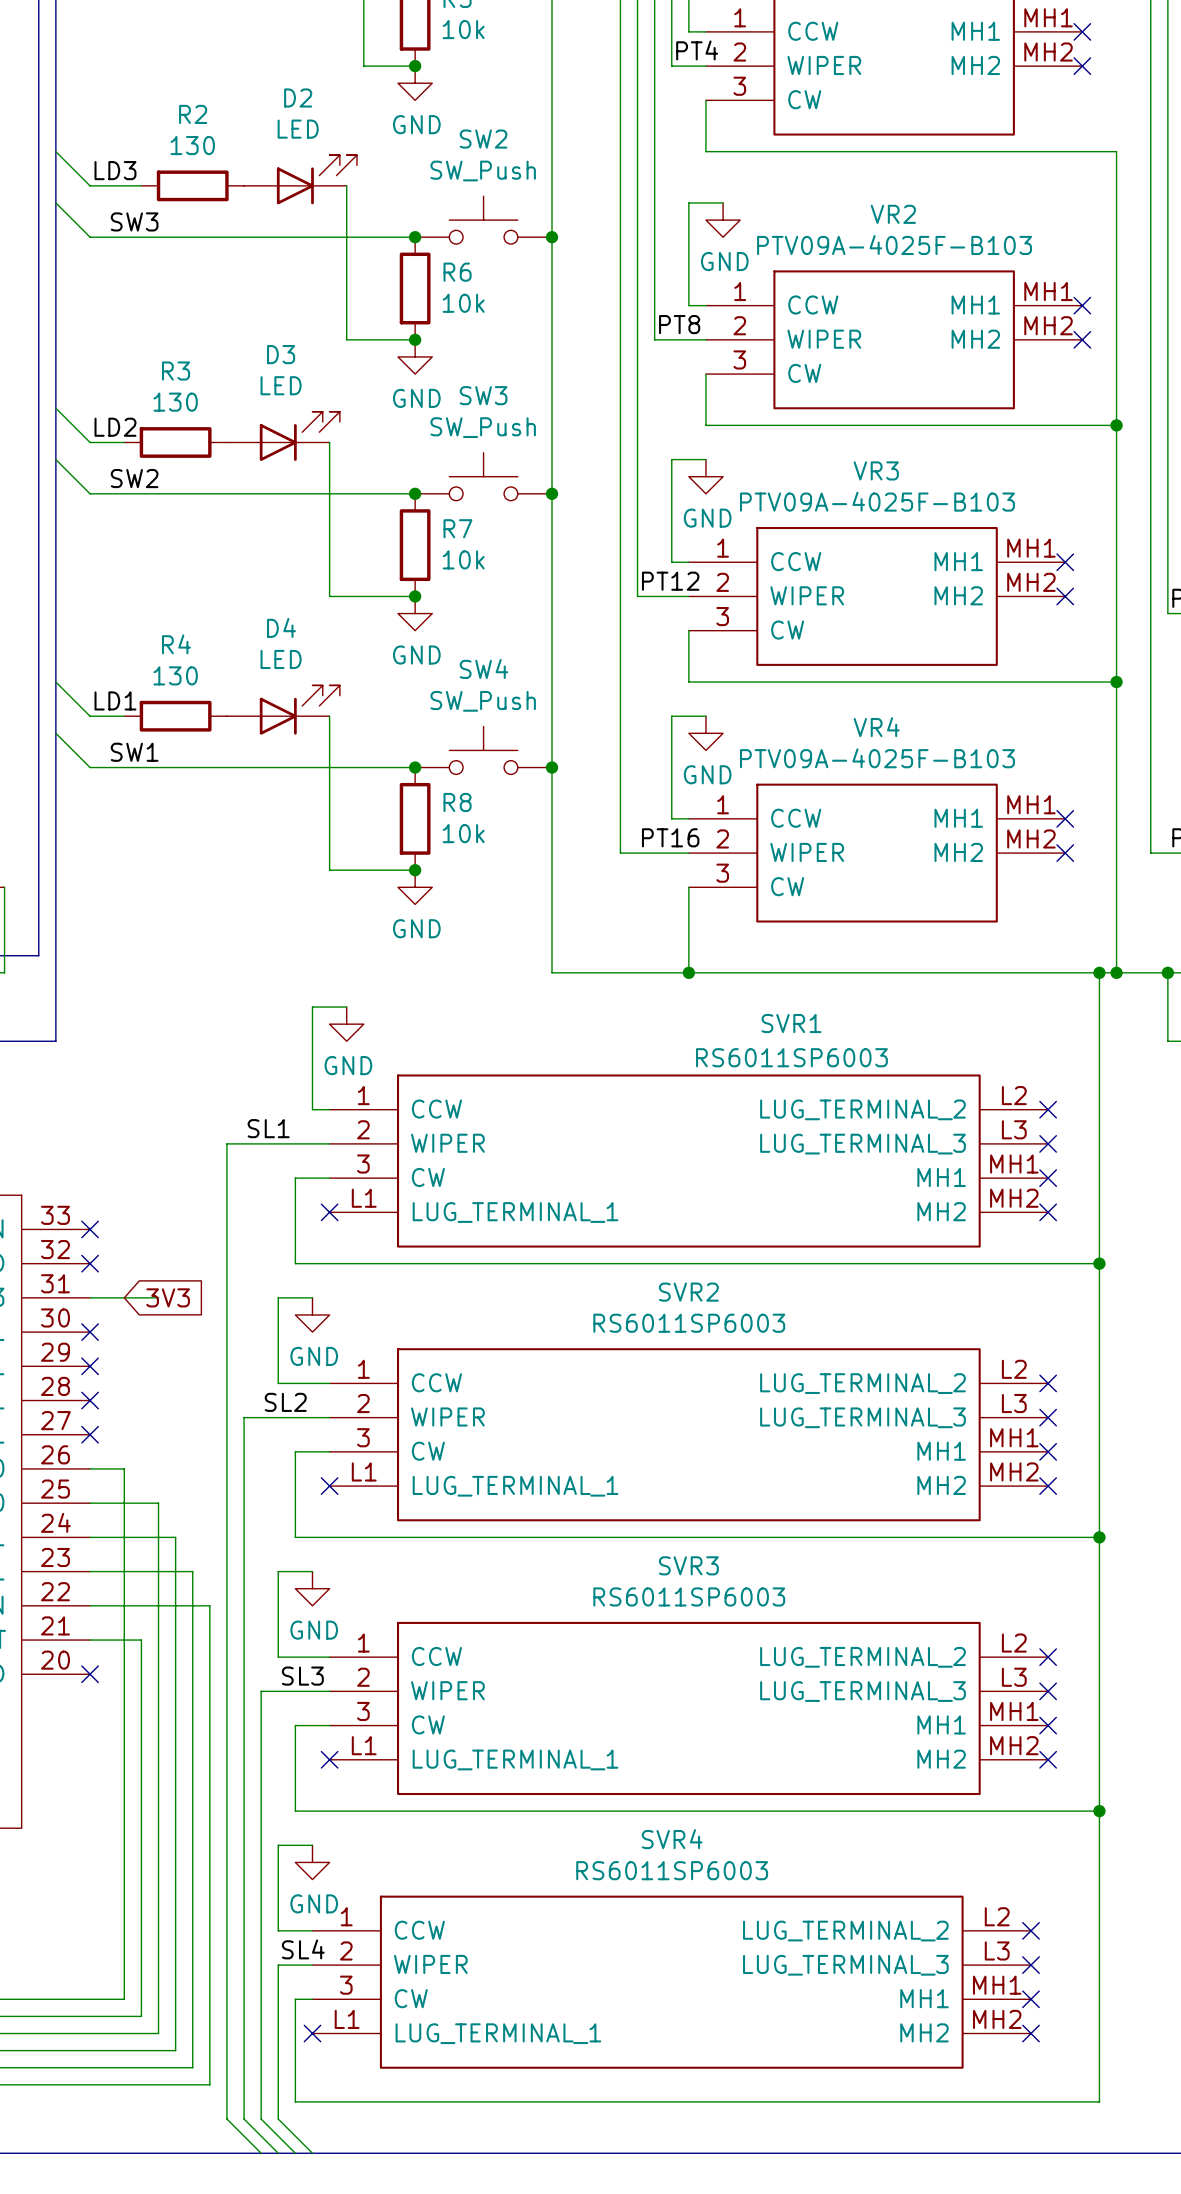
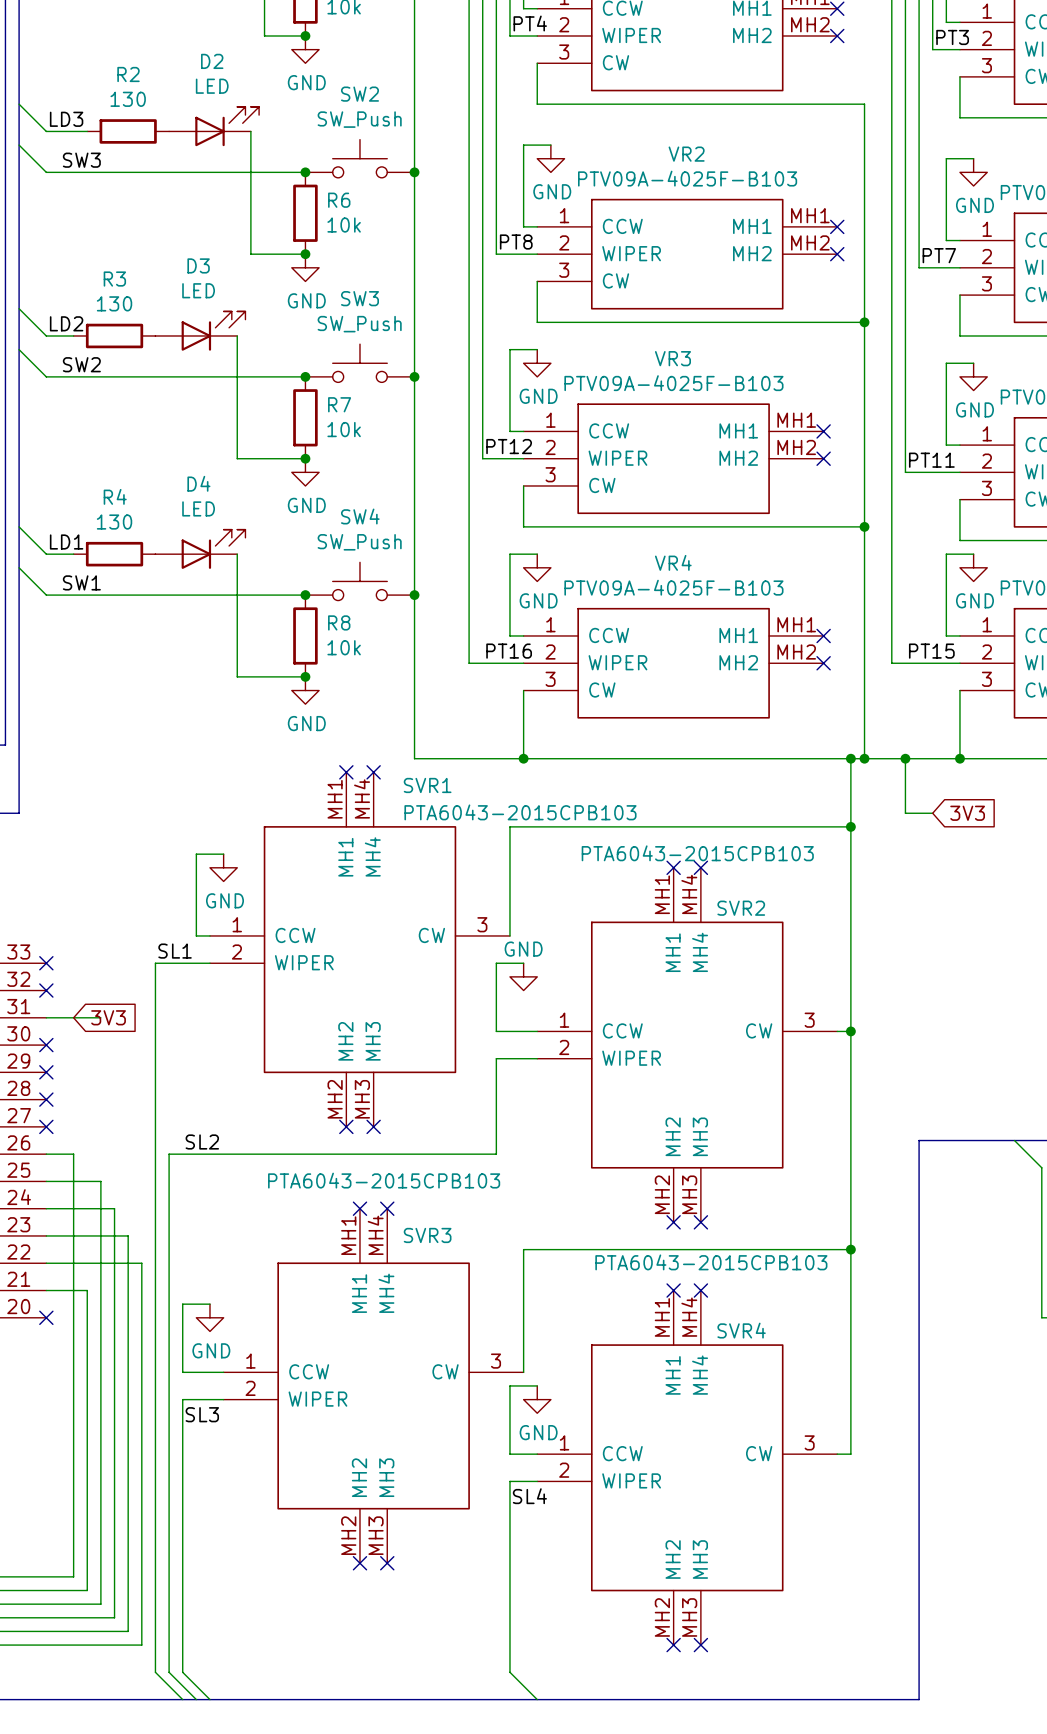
no-connect mark: none -> (346, 772)
no-connect mark: none -> (373, 772)
wire: (346, 1007) (312, 1007) (312, 1109) (329, 1109) -> (223, 854) (196, 854) (196, 935) (209, 935)
SVR1 name position: SVR1 (791, 1023) -> SVR1 (427, 785)
power symbol position: GND (346, 1024) -> GND (223, 867)
SVR1 value: RS6011SP6003 (791, 1057) -> PTA6043-2015CPB103 (520, 812)
wire: none -> (850, 826) (509, 826) (509, 935)
junction: none -> (850, 826)
SVR1 symbol: [329, 1074, 1049, 1248] -> [209, 772, 510, 1127]
no-connect mark: none -> (673, 867)
no-connect mark: none -> (700, 867)
no-connect mark: (1048, 1109) -> none
label position: SL1 (268, 1128) -> SL1 (175, 951)
wire: (329, 1143) (226, 1143) (226, 1229) -> (209, 963) (155, 963)
no-connect mark: (1048, 1143) -> none
wire: (329, 1178) (295, 1178) (295, 1263) (1099, 1263) -> none
no-connect mark: (1048, 1178) -> none
no-connect mark: (329, 1212) -> none
no-connect mark: (1048, 1212) -> none
wire: none -> (523, 963) (496, 963) (496, 1031) (537, 1031)
power symbol: none -> GND (523, 976)
junction position: (1099, 1263) -> (850, 1031)
SVR2 name position: SVR2 (688, 1292) -> SVR2 (741, 908)
wire: (312, 1297) (278, 1297) (278, 1383) (329, 1383) -> none
power symbol: GND (312, 1314) -> none
wire: none -> (837, 1031) (850, 1031)
SVR2 value: RS6011SP6003 (689, 1323) -> PTA6043-2015CPB103 (697, 853)
SVR2 symbol: [329, 1348, 1049, 1522] -> [537, 867, 838, 1223]
no-connect mark: (1048, 1383) -> none
label position: SL2 (285, 1402) -> SL2 (202, 1141)
wire: (329, 1417) (244, 1417) (244, 1468) -> (537, 1058) (496, 1058) (496, 1154) (169, 1154)
no-connect mark: (1048, 1417) -> none
no-connect mark: none -> (346, 1126)
no-connect mark: none -> (373, 1126)
wire: (329, 1451) (295, 1451) (295, 1537) (1099, 1537) -> none
no-connect mark: (1048, 1451) -> none
no-connect mark: (329, 1486) -> none
no-connect mark: (1048, 1486) -> none
no-connect mark: none -> (359, 1208)
no-connect mark: none -> (387, 1208)
junction position: (1099, 1537) -> (850, 1249)
no-connect mark: none -> (673, 1222)
no-connect mark: none -> (700, 1222)
SVR3 name position: SVR3 (688, 1565) -> SVR3 (427, 1235)
wire: (312, 1571) (278, 1571) (278, 1657) -> none
power symbol position: GND (312, 1588) -> GND (209, 1317)
wire: none -> (850, 1249) (523, 1249) (523, 1372)
SVR3 value: RS6011SP6003 (689, 1596) -> PTA6043-2015CPB103 (384, 1180)
SVR3 symbol: [329, 1621, 1049, 1796] -> [223, 1208, 524, 1564]
no-connect mark: none -> (673, 1290)
no-connect mark: none -> (700, 1290)
wire: (295, 1657) (329, 1657) -> none
no-connect mark: (1048, 1657) -> none
label position: SL3 (302, 1676) -> SL3 (202, 1414)
wire: (261, 1691) (329, 1691) -> (182, 1331) (182, 1304) (196, 1304)
no-connect mark: (1048, 1691) -> none
wire: (329, 1725) (295, 1725) (295, 1811) (1099, 1811) -> none
no-connect mark: (1048, 1725) -> none
wire: (261, 1742) (261, 1776) -> (182, 1372) (223, 1372)
no-connect mark: (329, 1759) -> none
wire: none -> (537, 1385) (509, 1385) (509, 1454) (537, 1454)
no-connect mark: (1048, 1759) -> none
wire: none -> (182, 1399) (223, 1399)
power symbol: none -> GND (537, 1399)
junction: (1099, 1811) -> none
SVR4 name position: SVR4 (672, 1839) -> SVR4 (741, 1330)
wire: (312, 1845) (278, 1845) (278, 1930) (312, 1930) -> none
wire: (1099, 1845) (1099, 2101) (295, 2101) (295, 1999) (312, 1999) -> (850, 1454) (837, 1454)
power symbol: GND (312, 1862) -> none
SVR4 value: RS6011SP6003 (672, 1870) -> PTA6043-2015CPB103 (711, 1262)
wire: none -> (537, 1481) (509, 1481) (509, 1672) (537, 1699)
SVR4 symbol: [312, 1895, 1032, 2069] -> [537, 1290, 838, 1646]
label: none -> SL4 (529, 1496)
no-connect mark: (1031, 1930) -> none
label: SL4 (303, 1949) -> none
wire: (312, 1965) (278, 1965) (278, 2119) (312, 2153) -> none
no-connect mark: (1031, 1965) -> none
no-connect mark: none -> (359, 1563)
no-connect mark: none -> (387, 1563)
no-connect mark: (1031, 1999) -> none
no-connect mark: (312, 2033) -> none
no-connect mark: (1031, 2033) -> none
no-connect mark: none -> (673, 1645)
no-connect mark: none -> (700, 1645)

